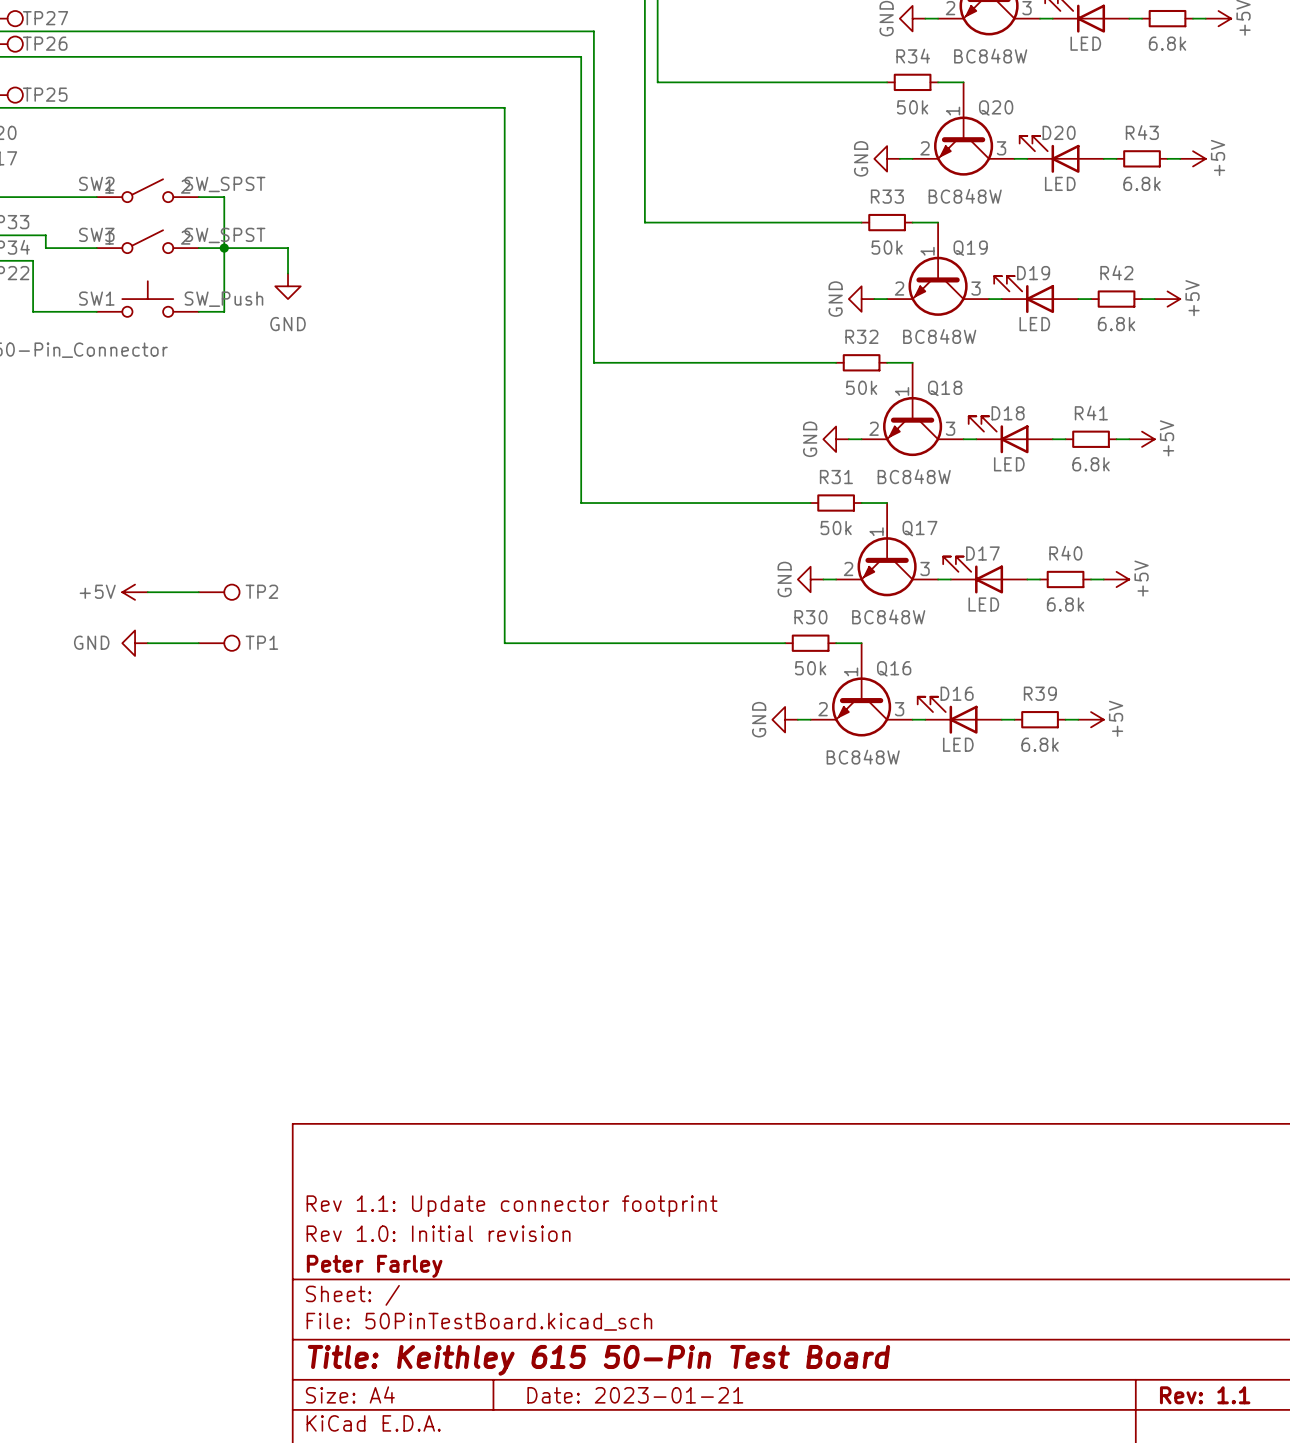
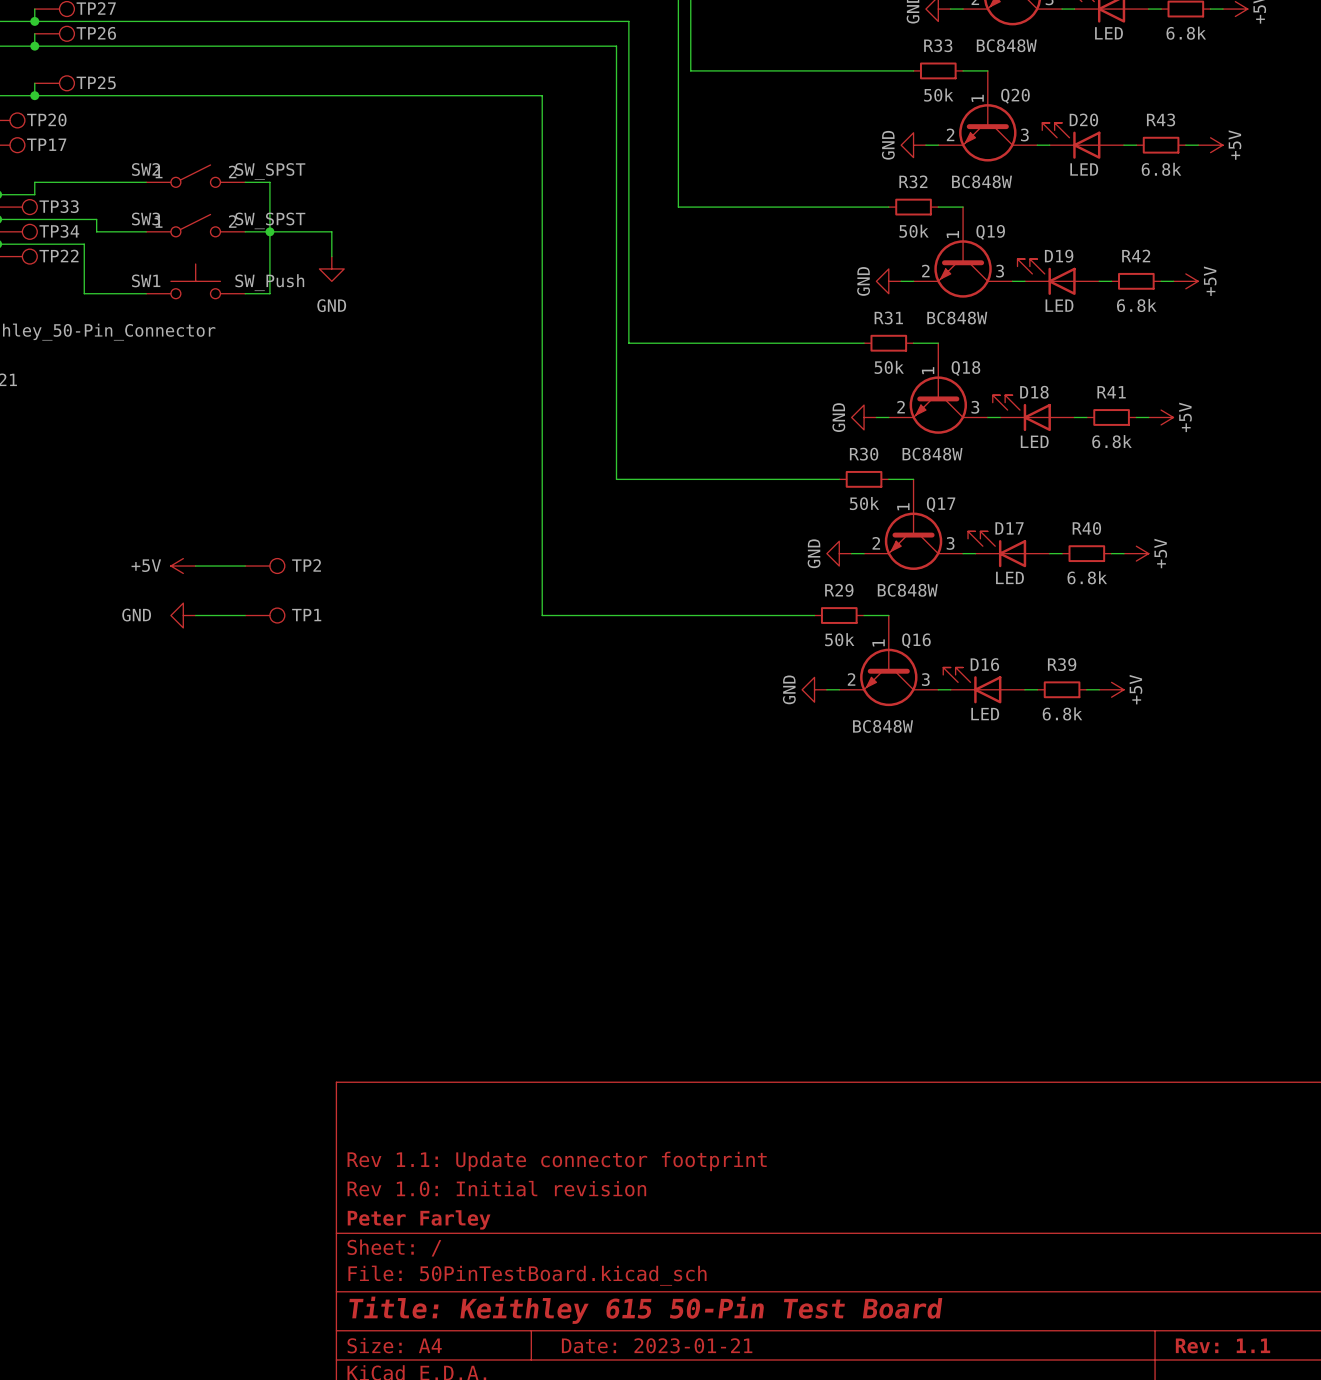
R34 name: R34 (913, 56) -> R33 (938, 45)
R33 name: R33 (887, 196) -> R32 (913, 181)
R32 name: R32 (861, 336) -> R31 (888, 318)
R31 name: R31 (836, 477) -> R30 (864, 454)
R30 name: R30 (810, 617) -> R29 (839, 590)

